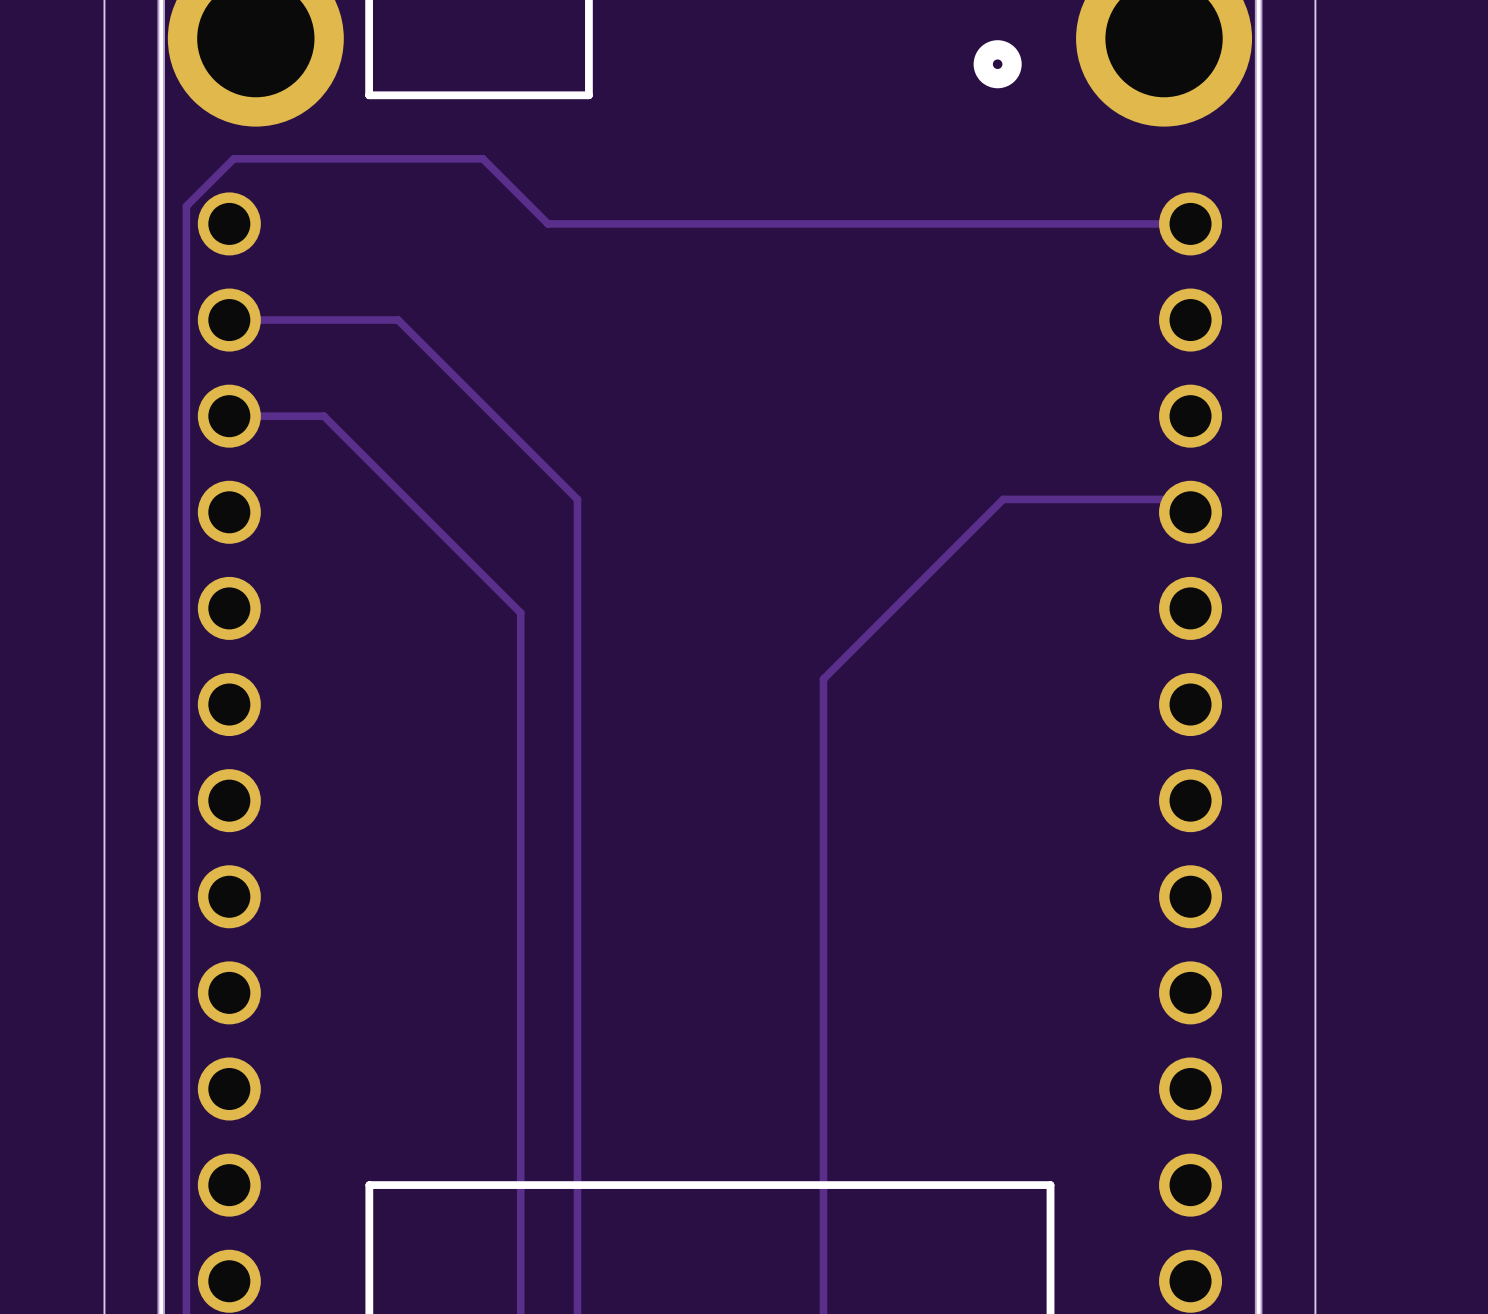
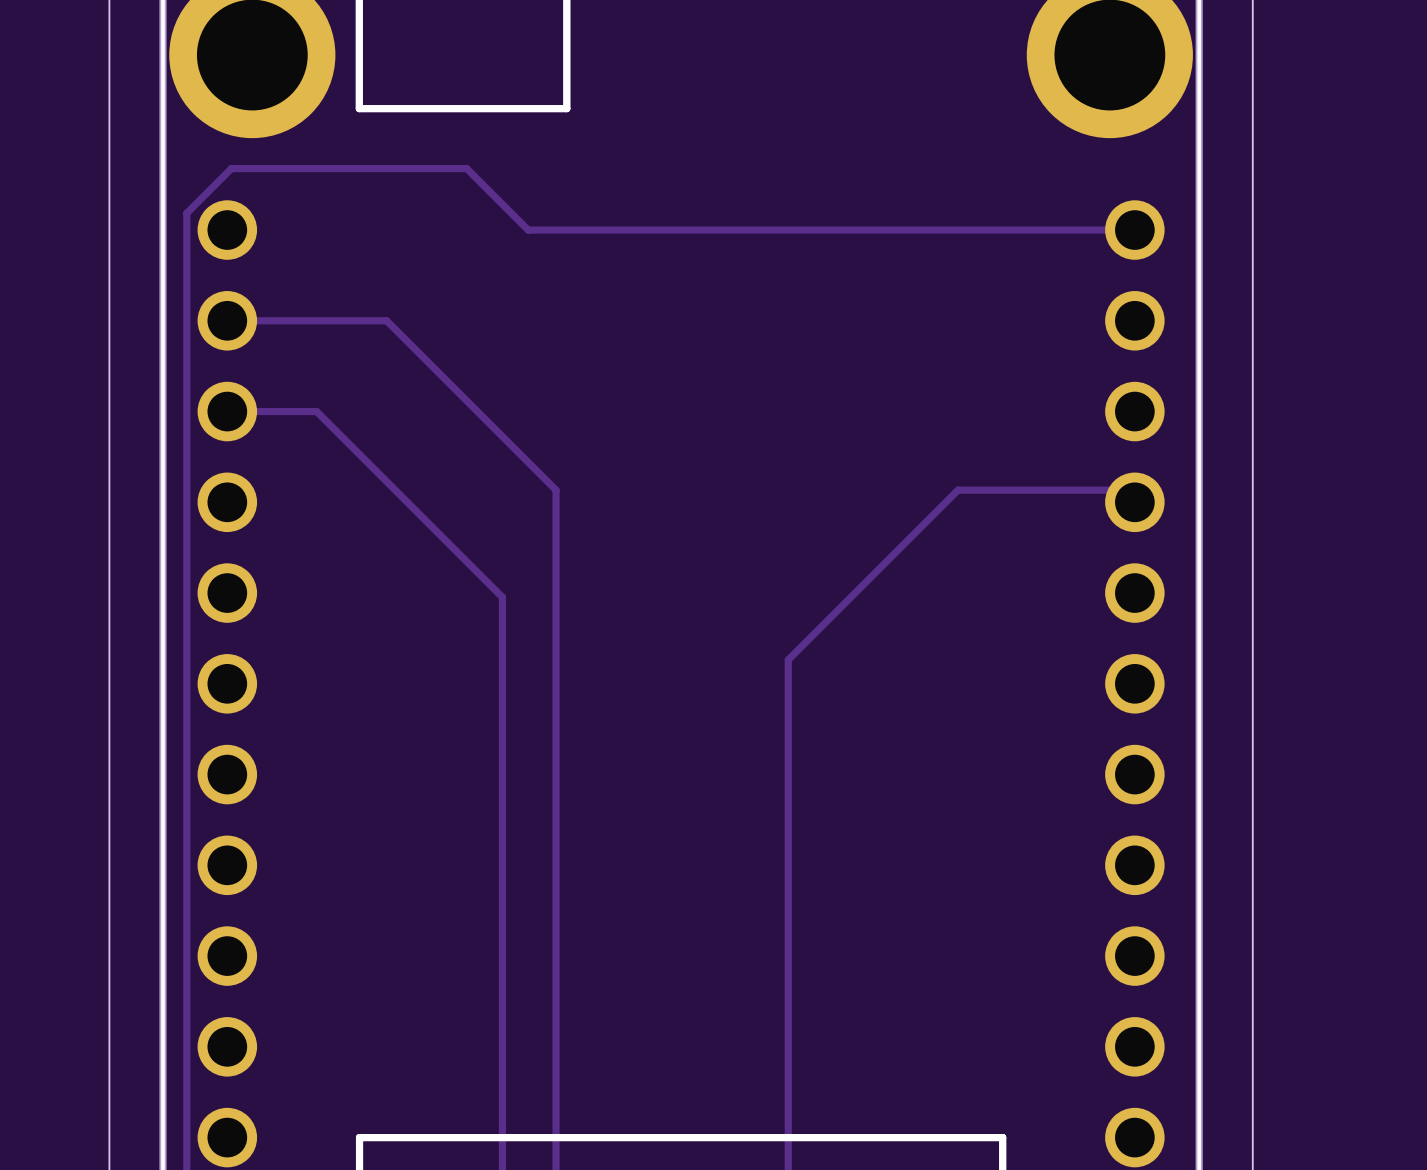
part: (997, 64) -> none

